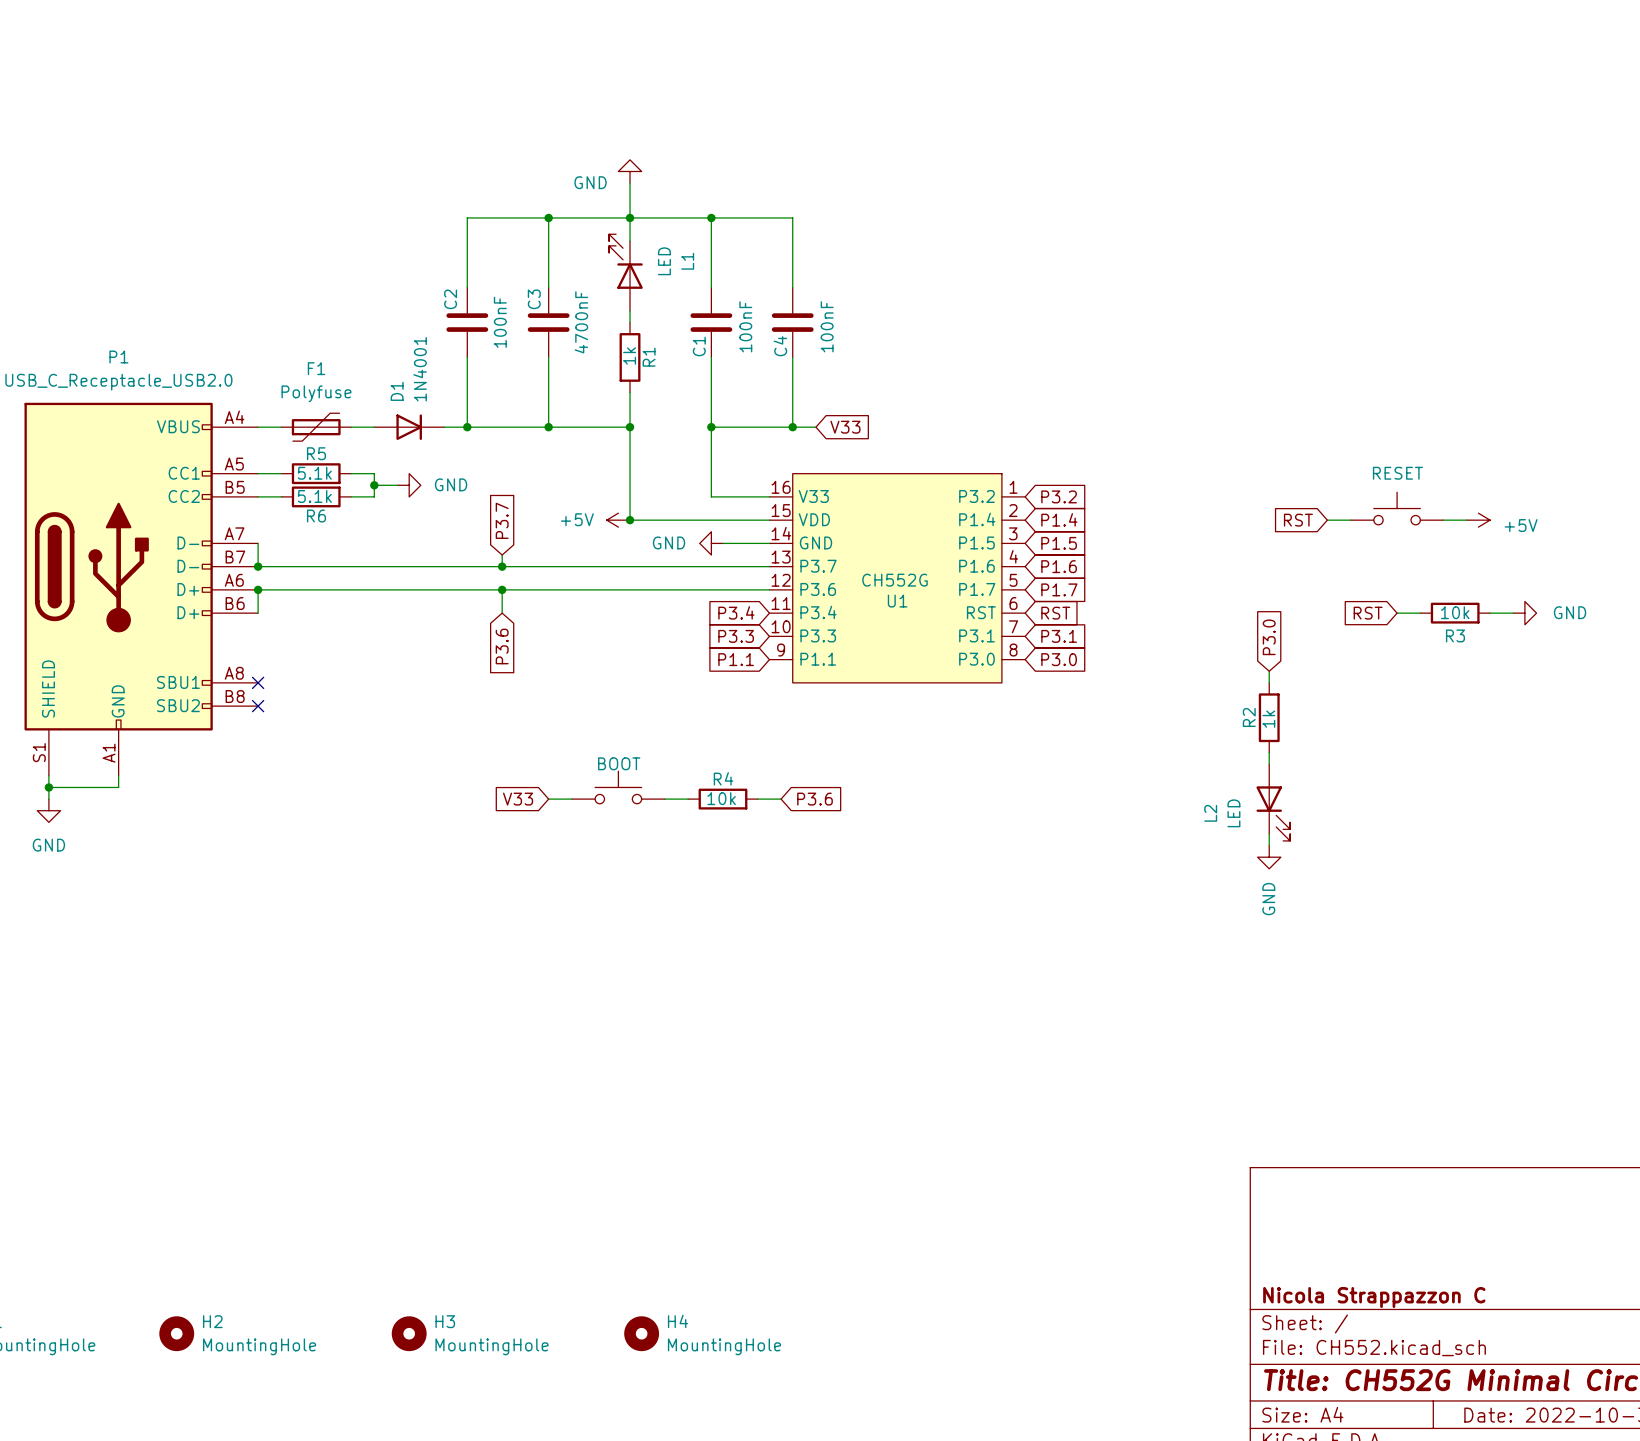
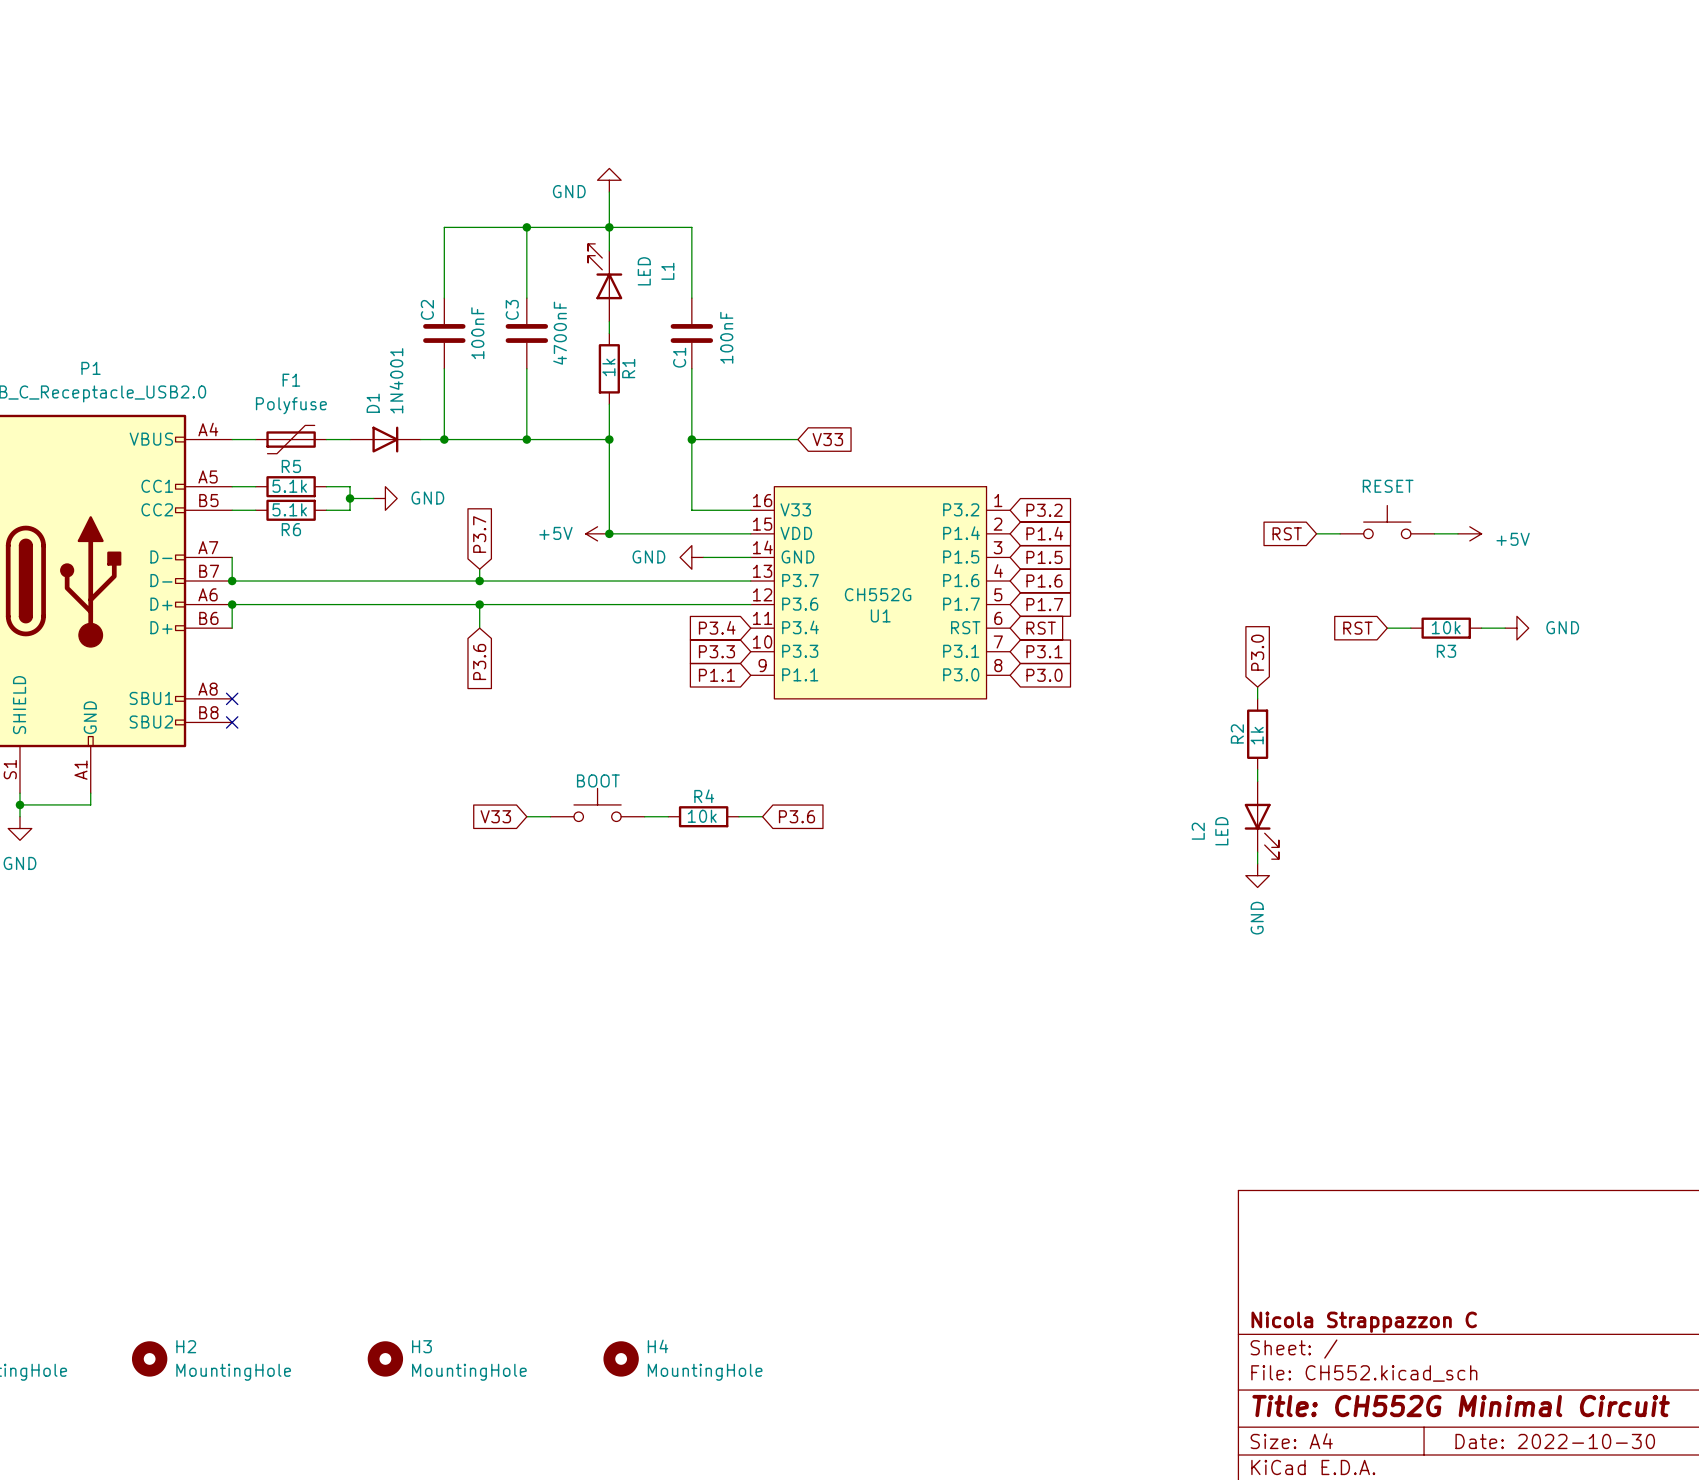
wire: (711, 217) (792, 217) (792, 287) -> none
junction: (711, 217) -> none
C4: 100nF (792, 322) -> none
wire: (792, 357) (792, 427) -> none
junction: (792, 427) -> none

